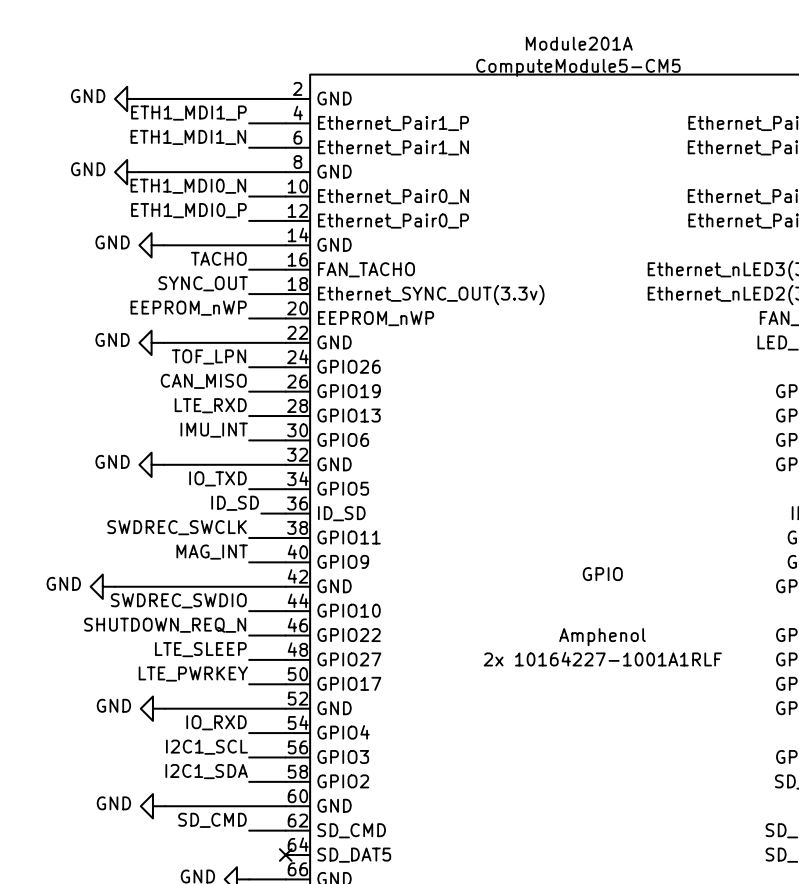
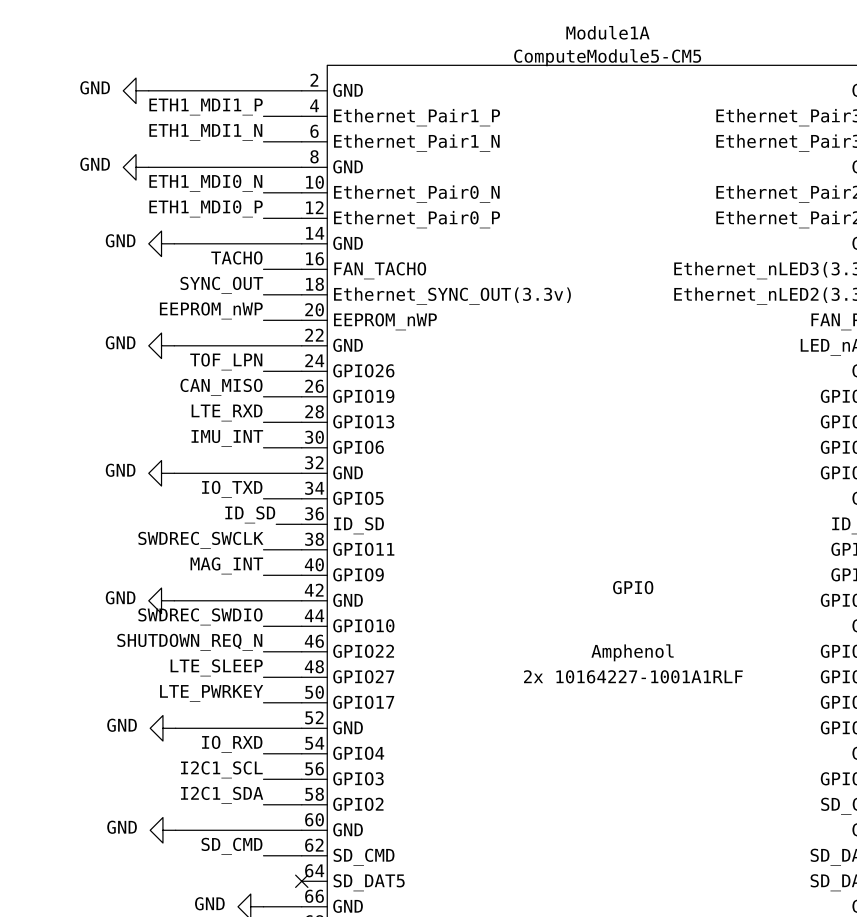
Module201A name: Module201A (579, 43) -> Module1A (607, 32)
power symbol position: GND (102, 586) -> GND (161, 600)
wire: (115, 586) (163, 586) -> none

